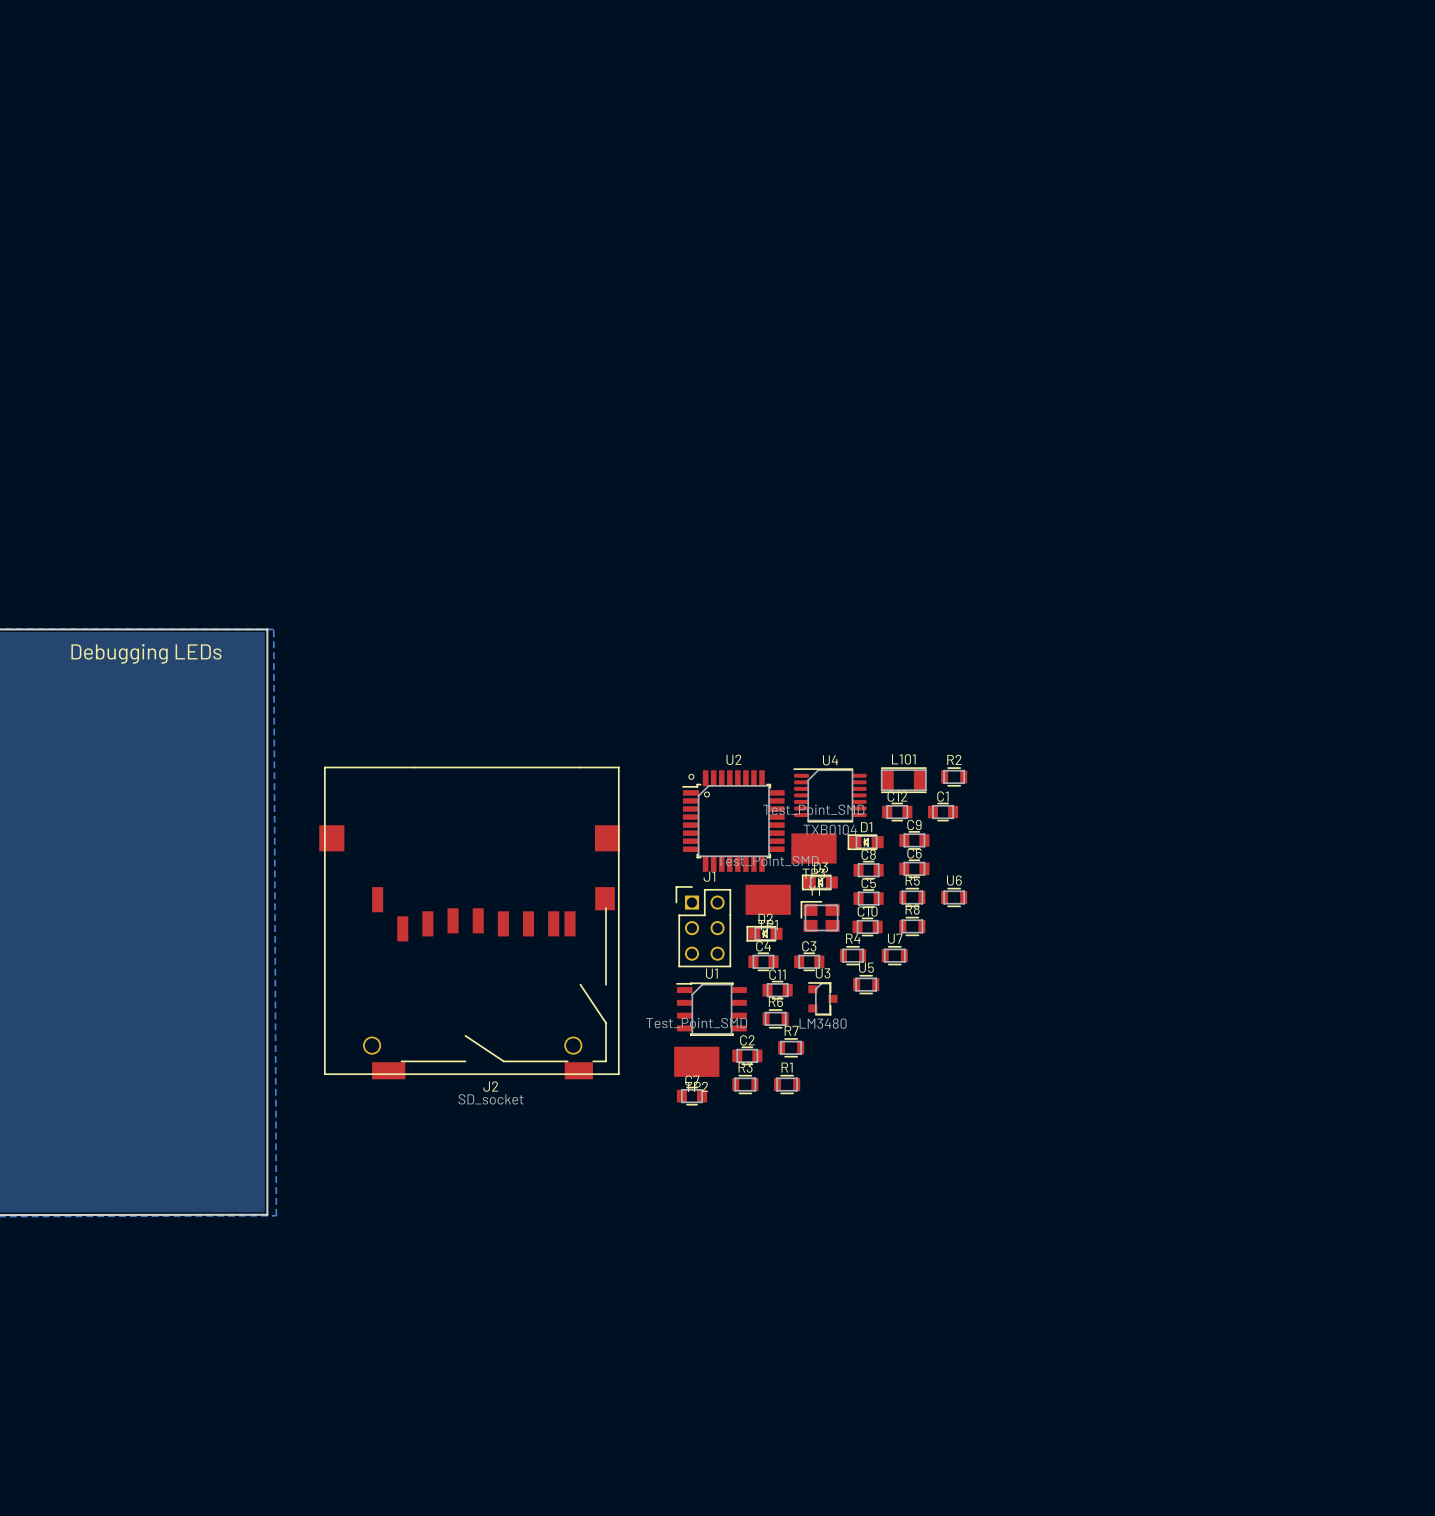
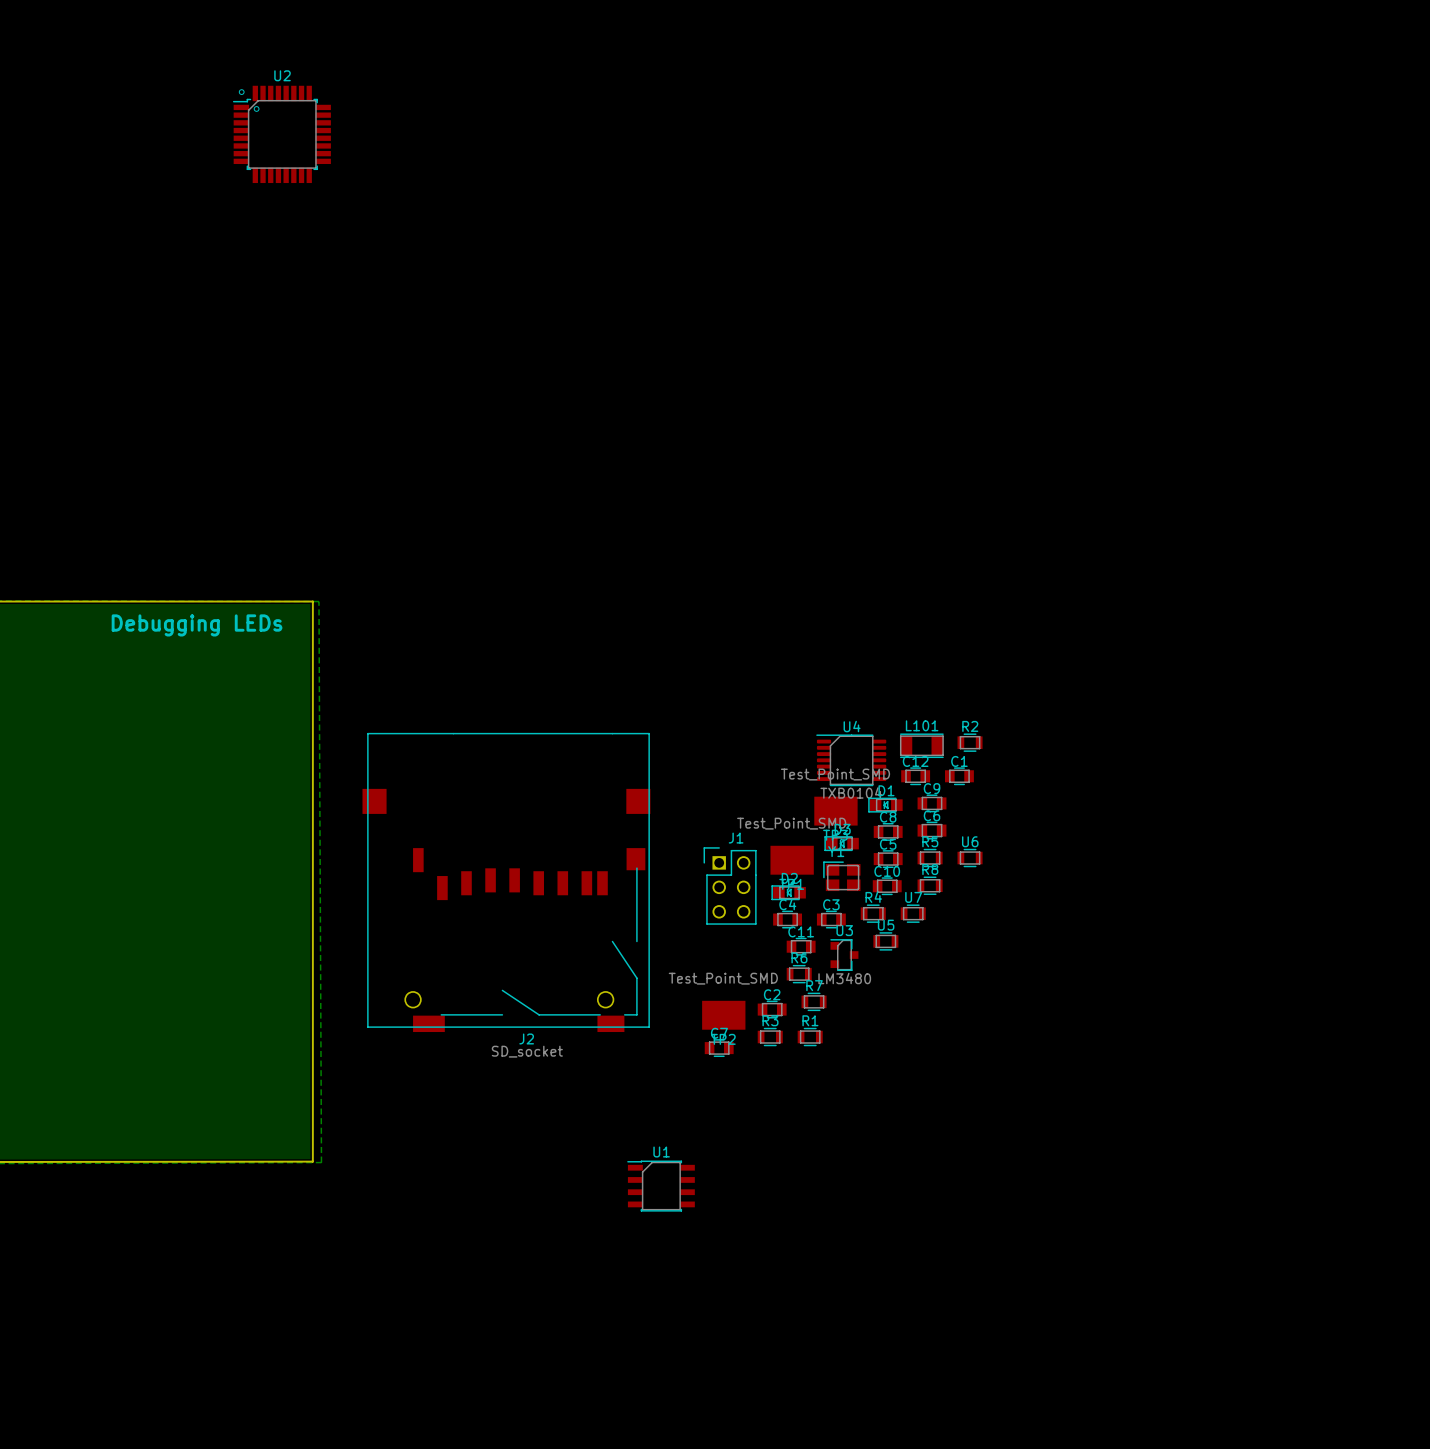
U2 position: (733, 821) -> (281, 134)
U1 position: (711, 1009) -> (661, 1186)

